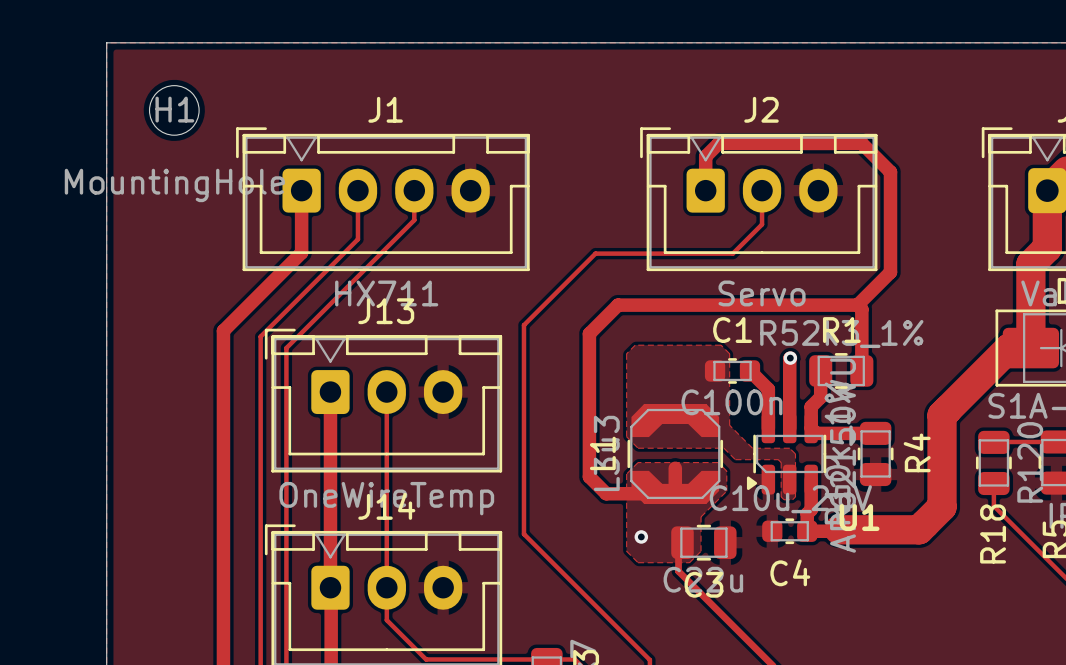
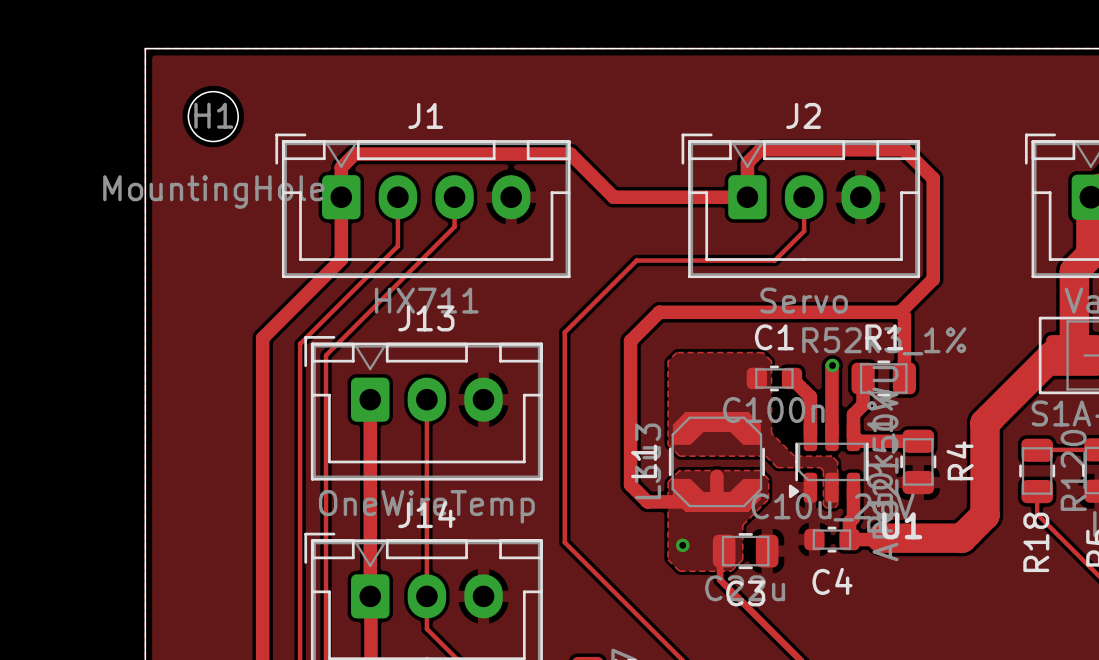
track: none -> (341, 197) (341, 167) (354, 154) (570, 154) (613, 197) (747, 197)

